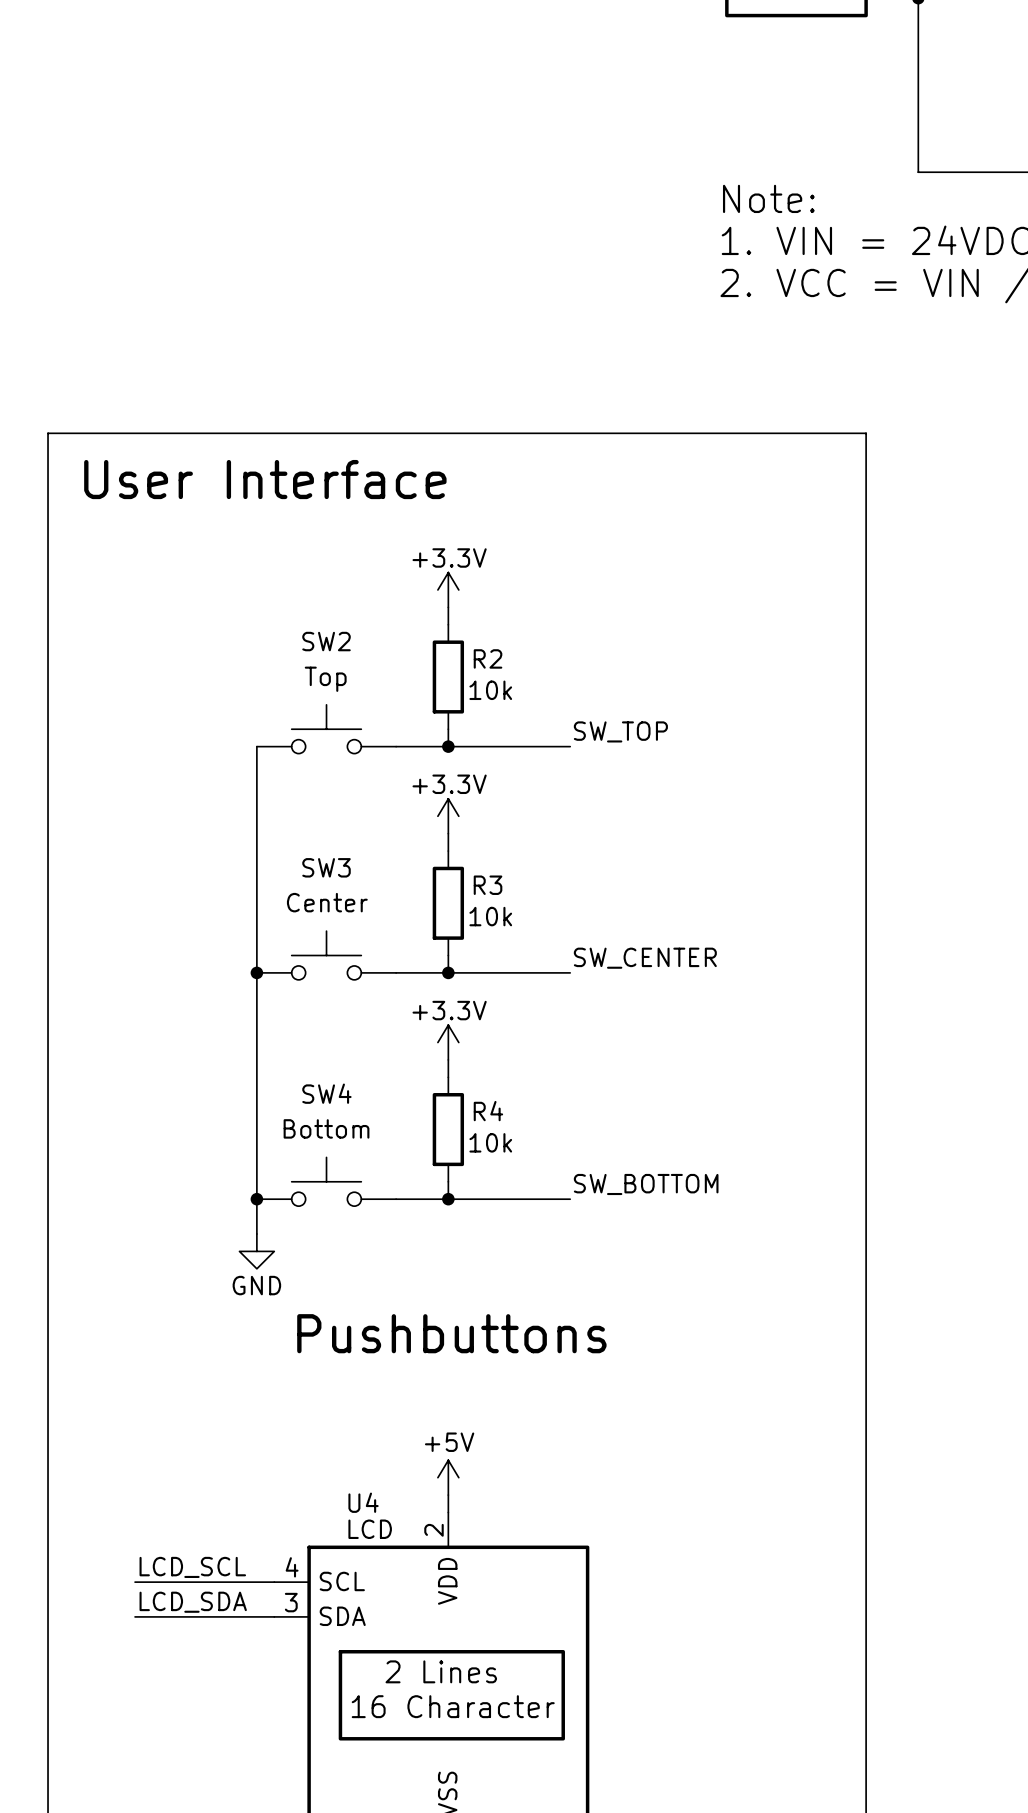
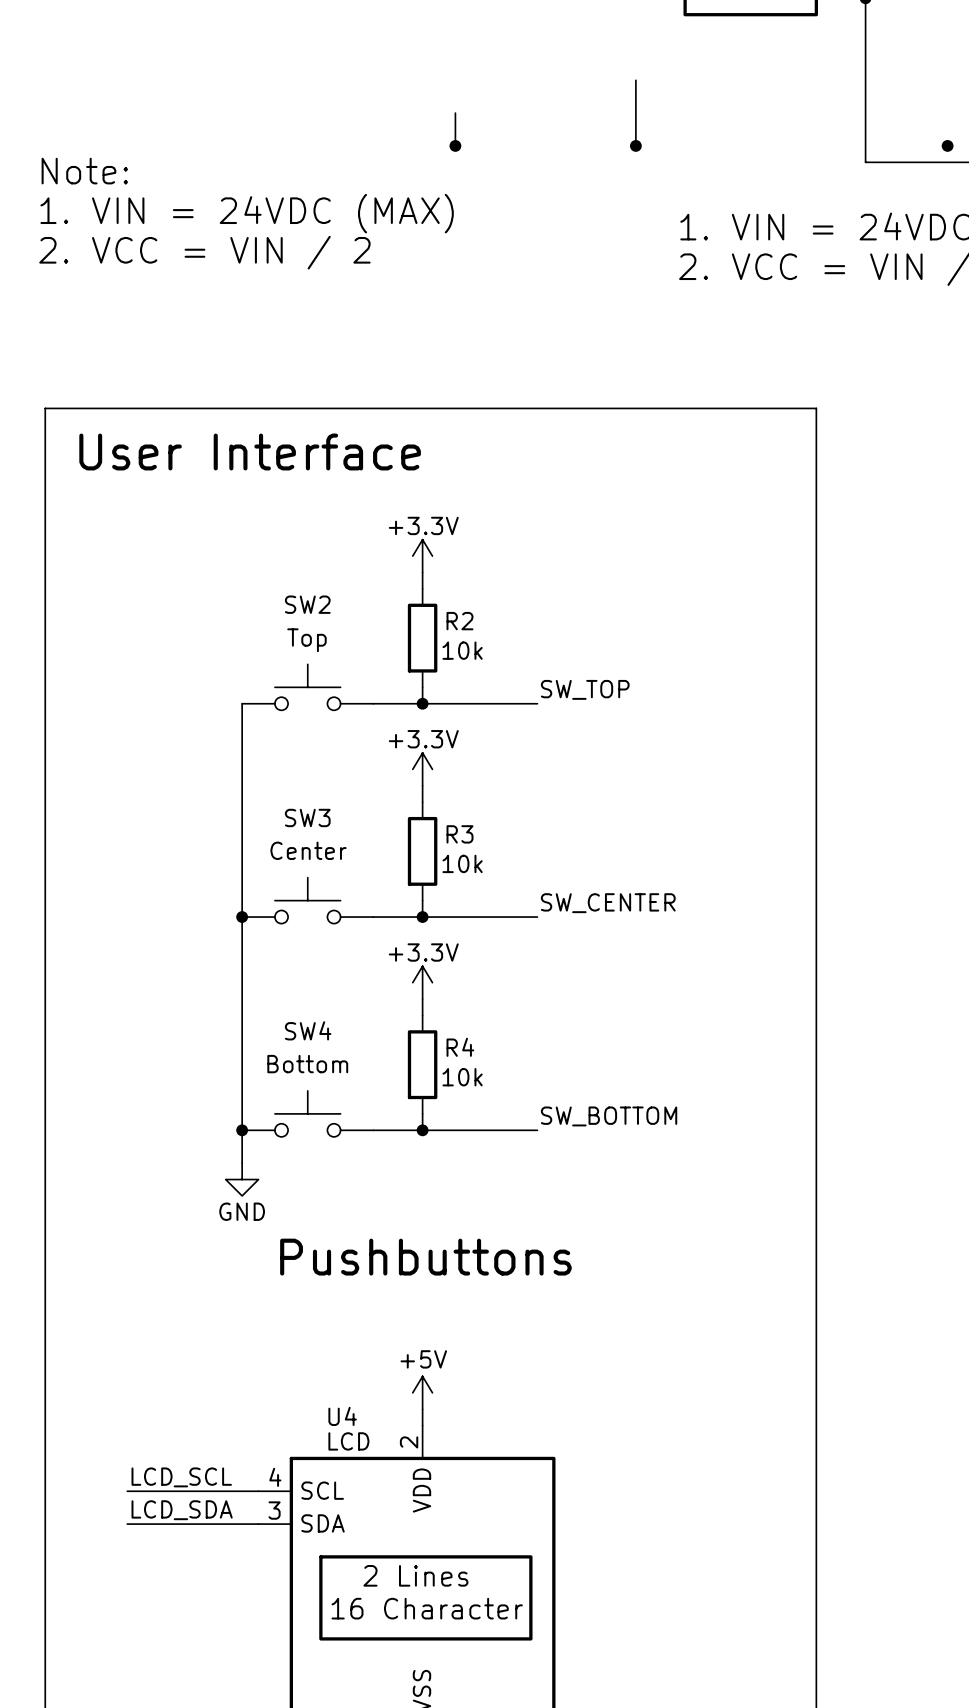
wire: none -> (635, 80) (635, 145)
wire: none -> (455, 113) (455, 145)
junction: none -> (455, 145)
junction: none -> (635, 145)
junction: none -> (947, 145)
text: none -> Note: (84, 171)
text: Note: (768, 198) -> none
text: none -> 1. VIN = 24VDC (MAX) (247, 213)
text: none -> 2. VCC = VIN / 2 (204, 252)

